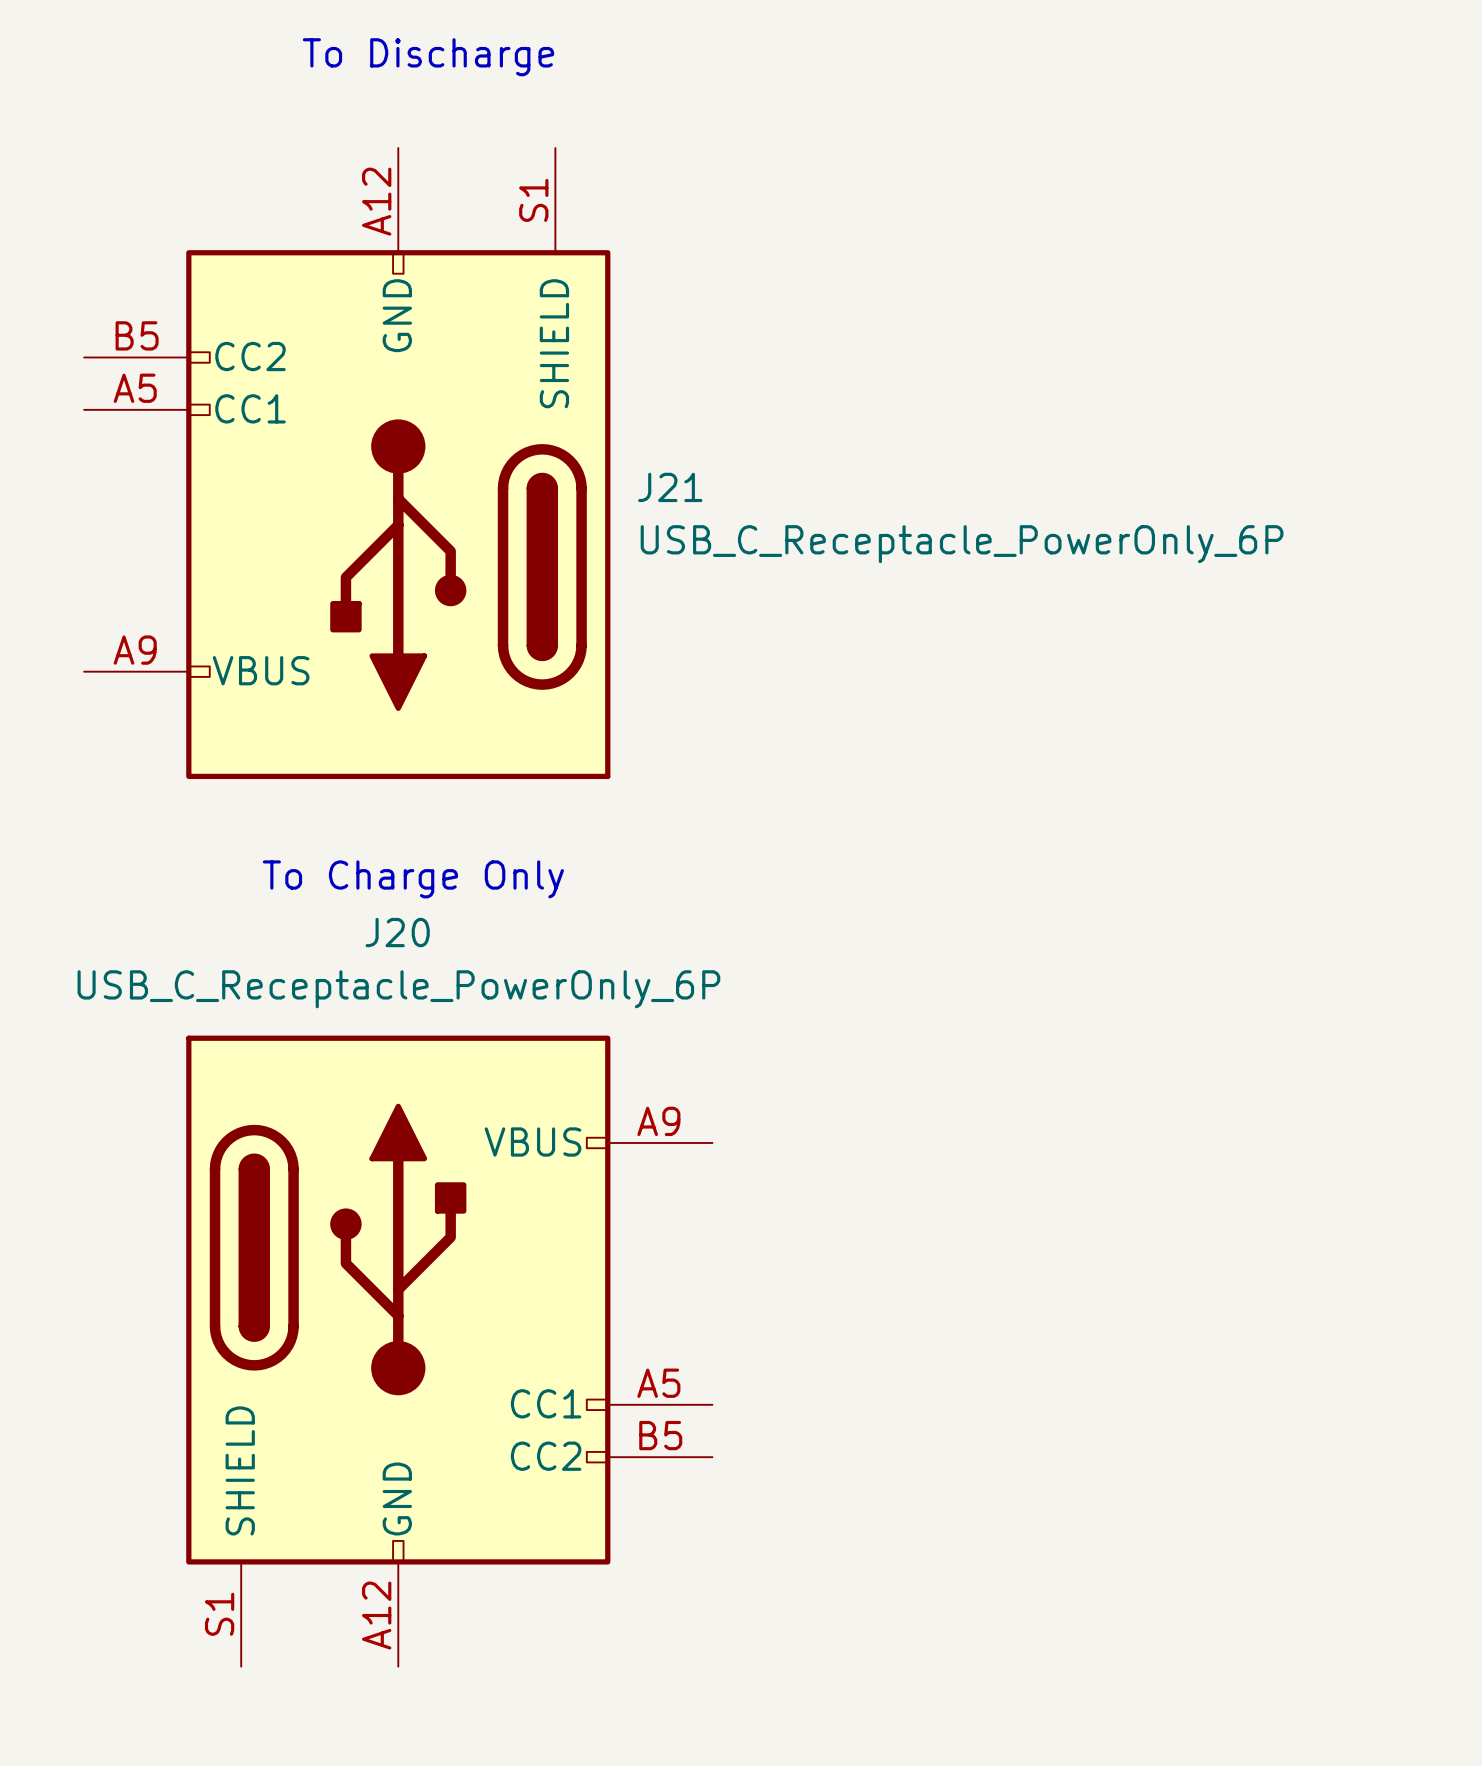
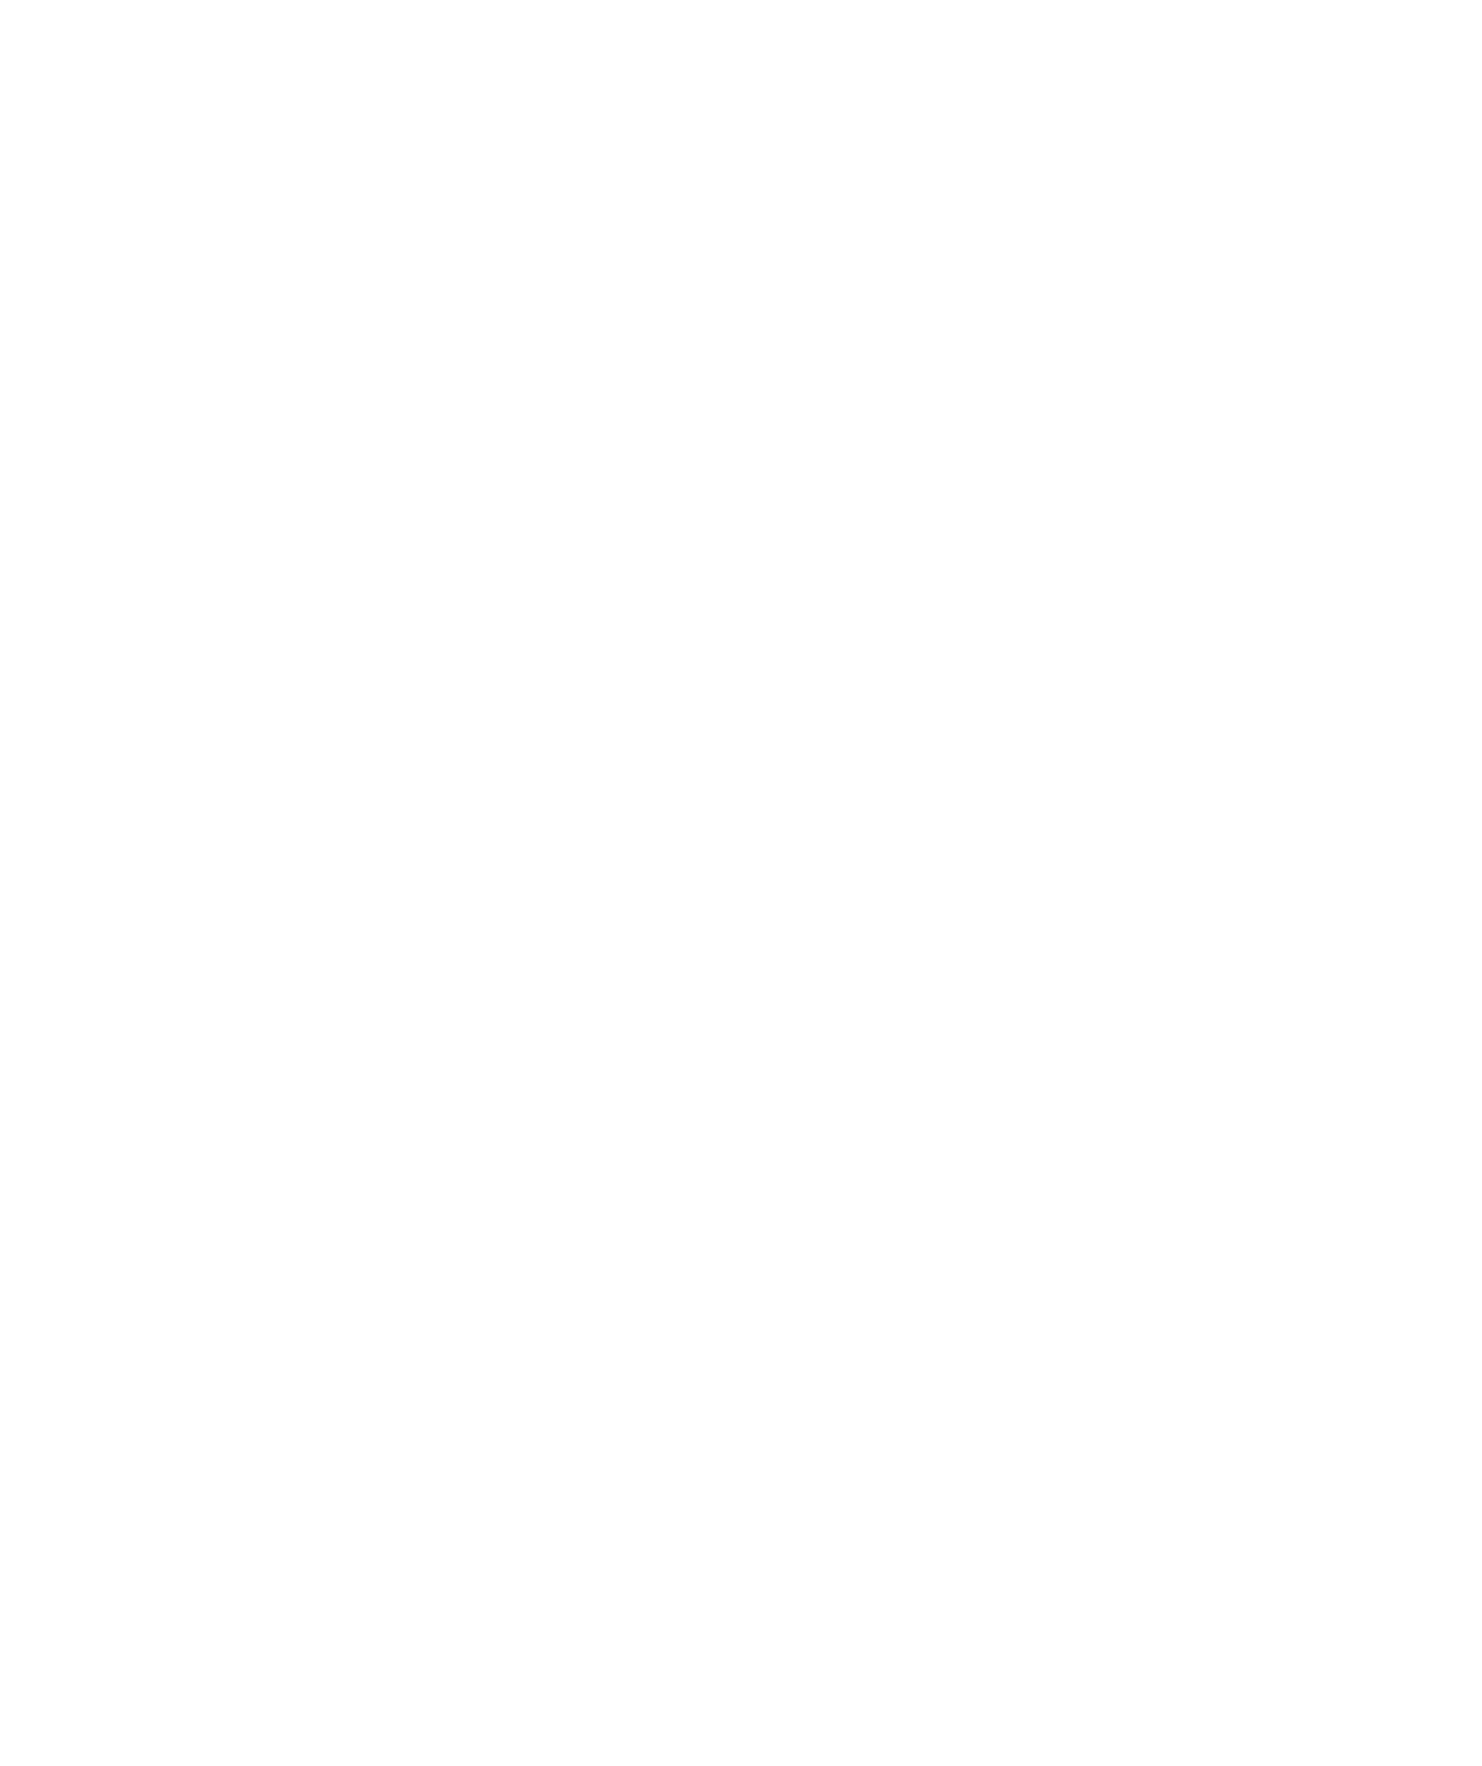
text: To Discharge (428, 57) -> none
J21: USB_C_Receptacle_PowerOnly_6P (347, 463) -> none
text: To Charge Only (413, 879) -> none
J20: USB_C_Receptacle_PowerOnly_6P (449, 1351) -> none

